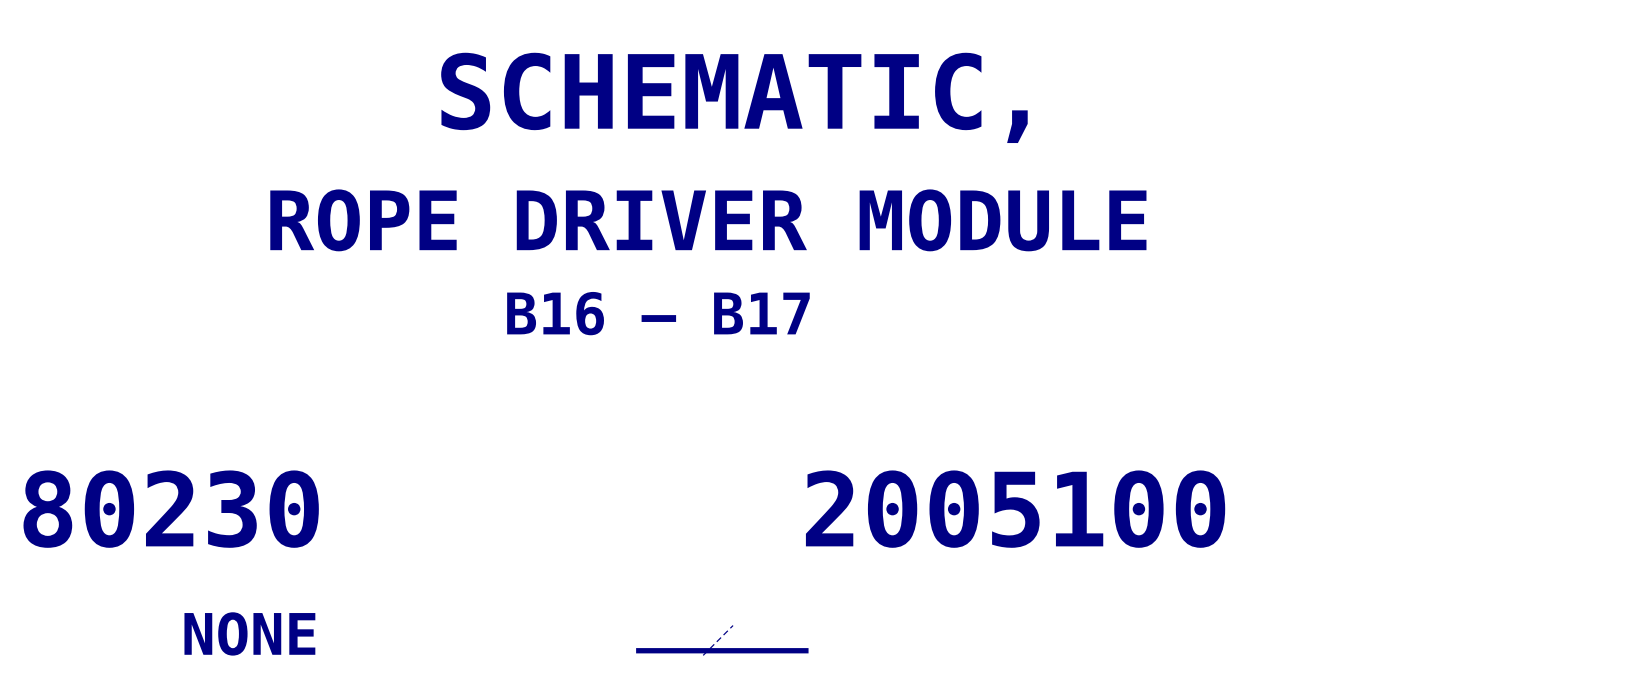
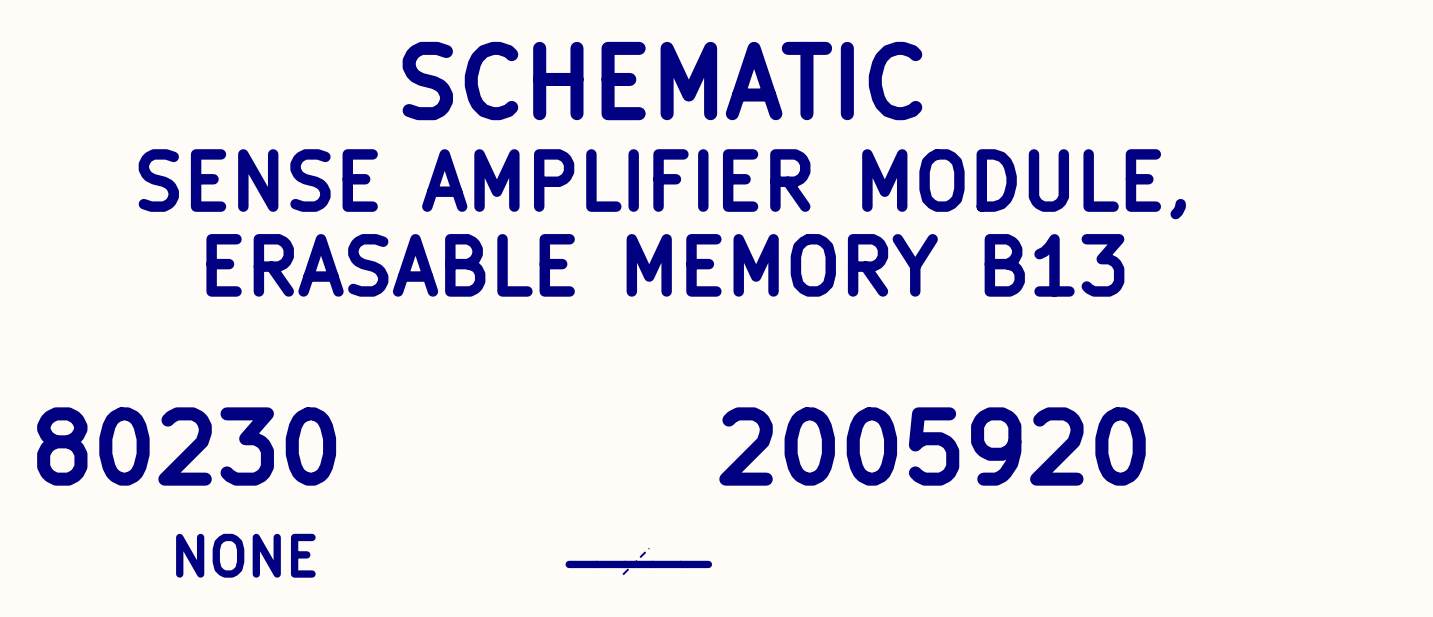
text: SCHEMATIC, (734, 97) -> SCHEMATIC (662, 81)
text: none -> SENSE AMPLIFIER MODULE, (662, 184)
text: ROPE DRIVER MODULE (708, 220) -> none
text: none -> ERASABLE MEMORY B13 (665, 265)
text: B16 — B17 (658, 313) -> none
text: 2005100 (1015, 509) -> 2005920 (932, 446)

